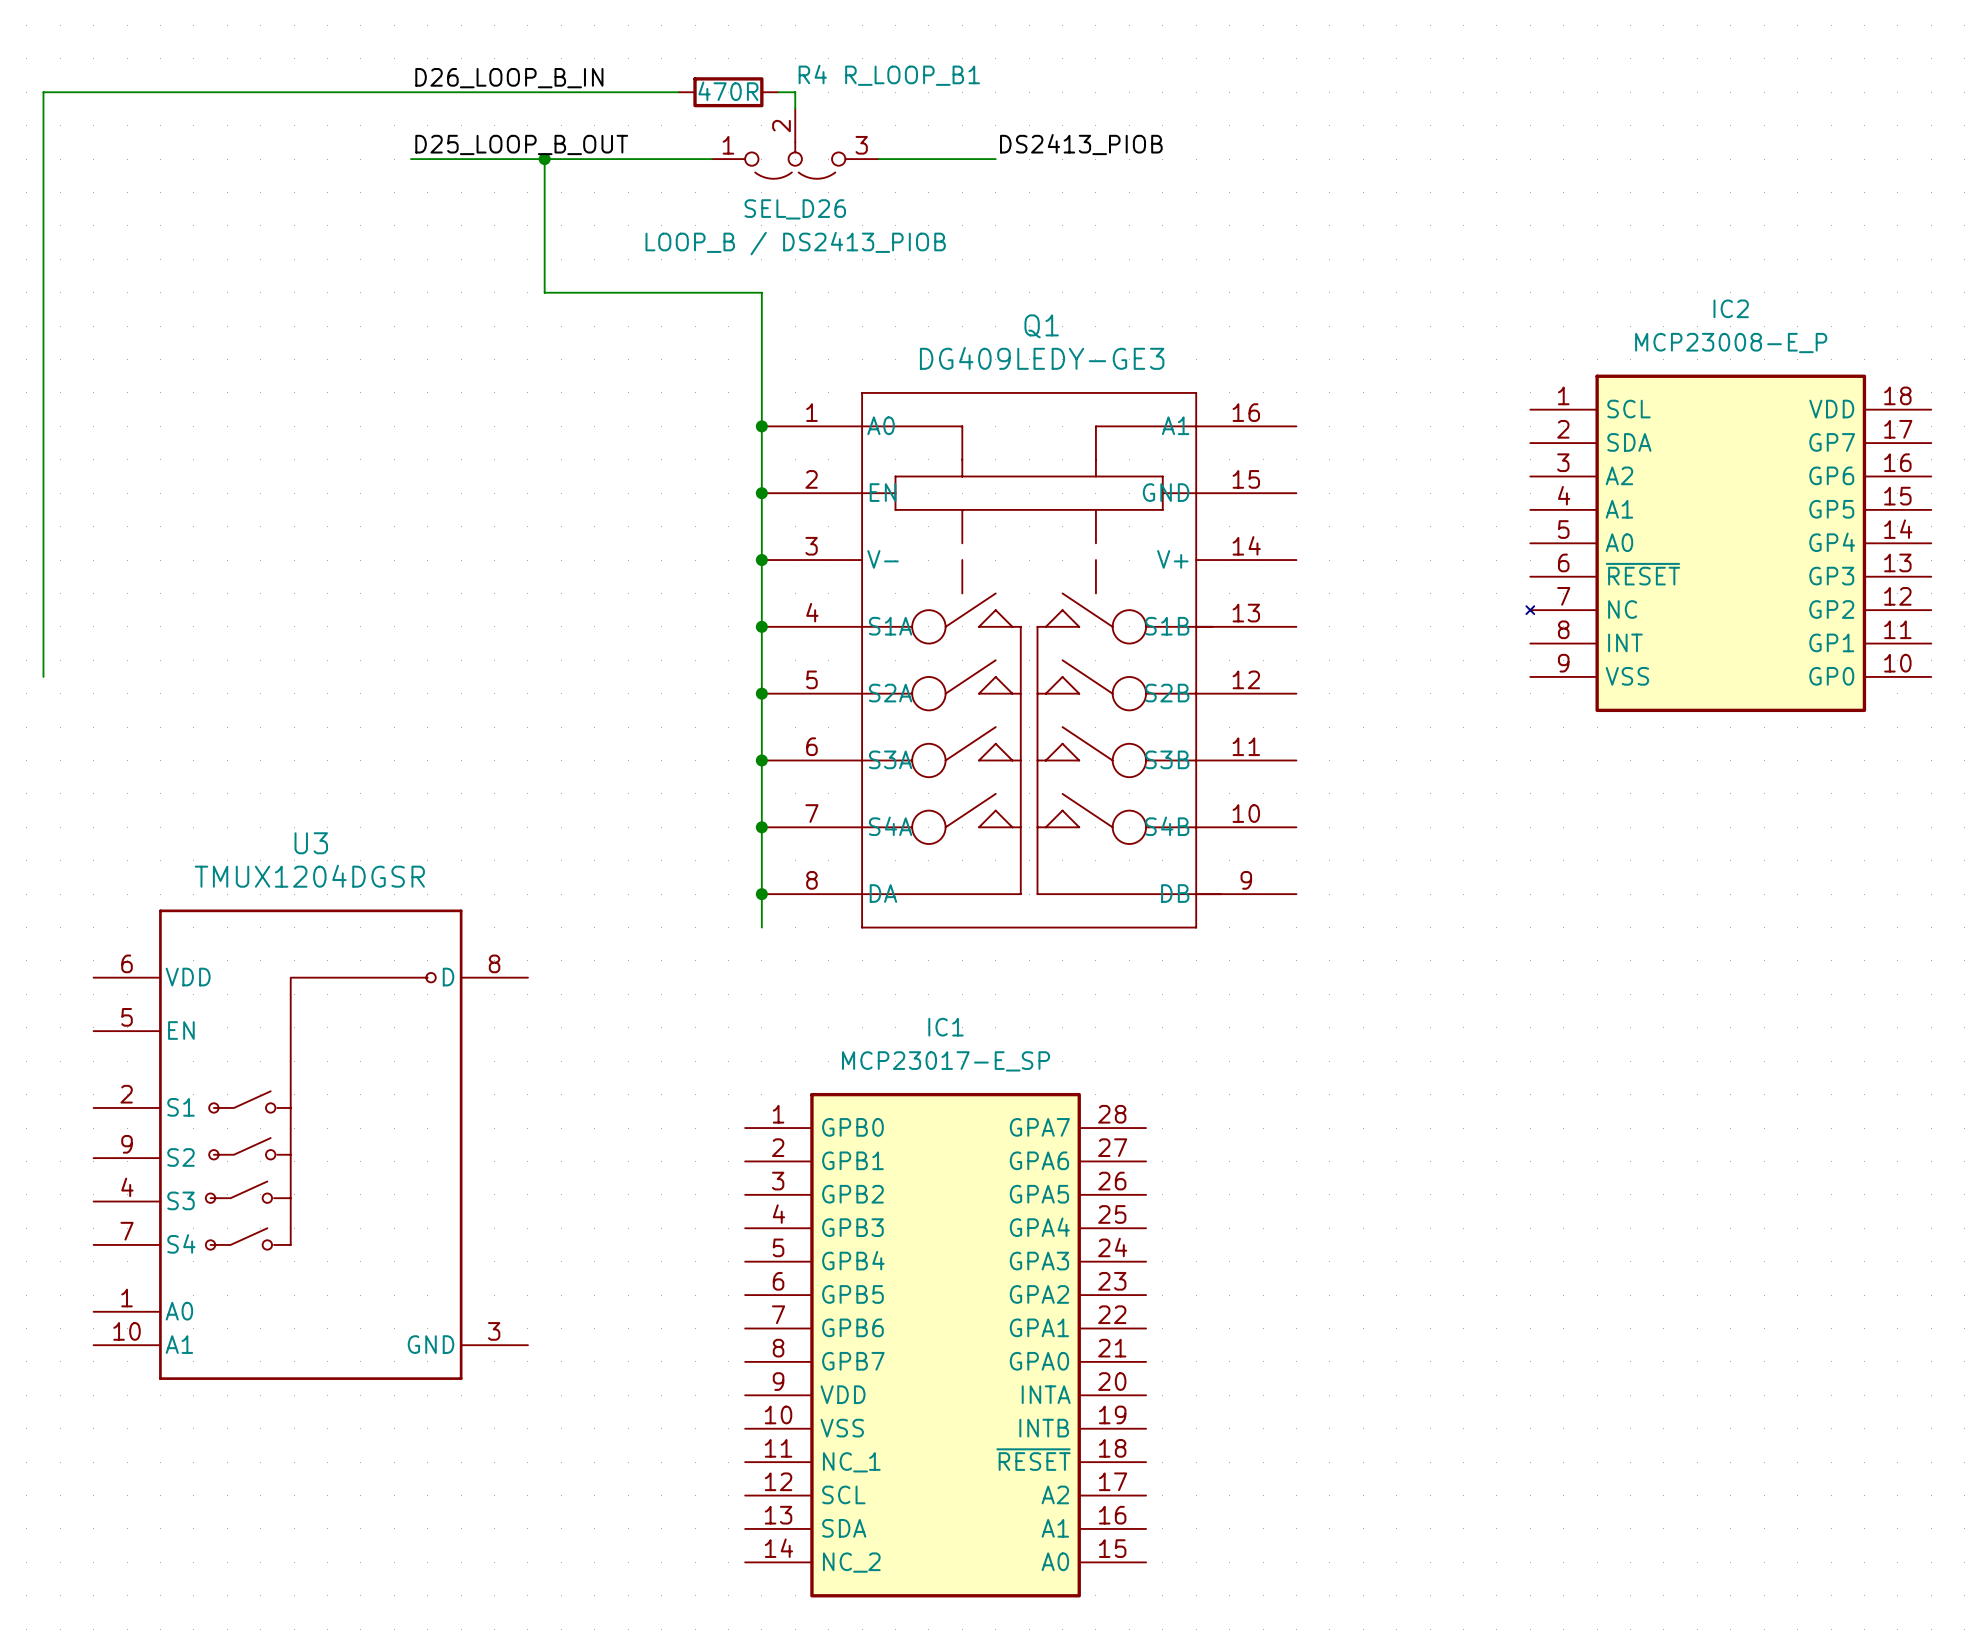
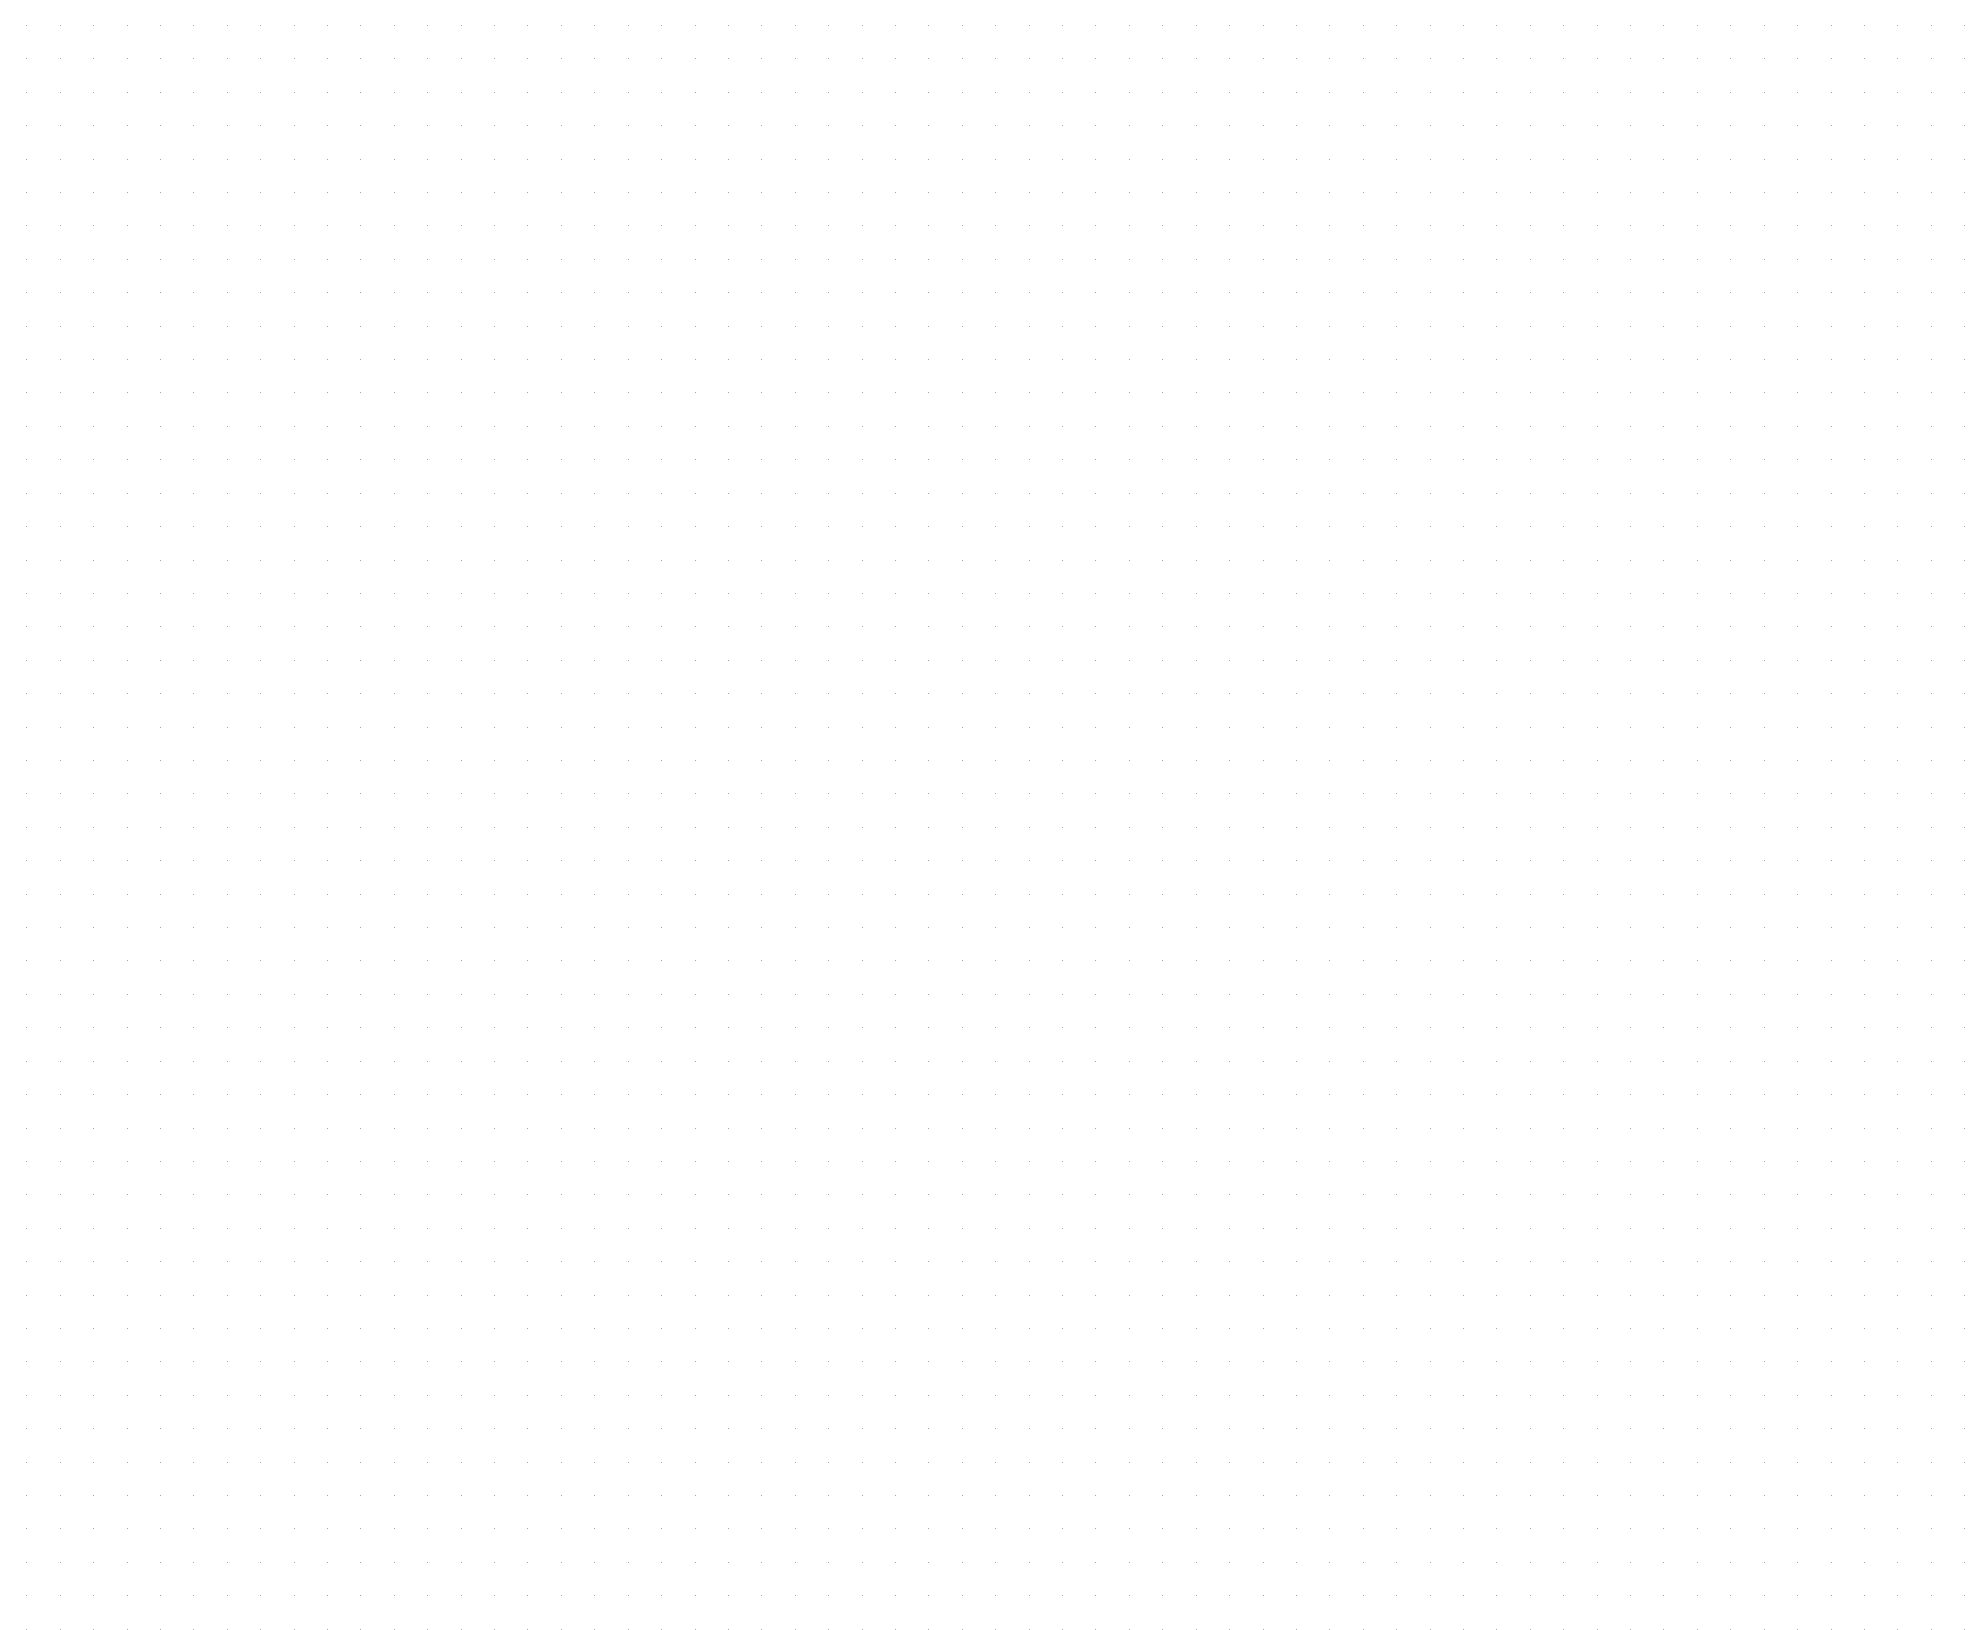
label: D26_LOOP_B_IN (509, 78) -> none
wire: (678, 92) (43, 92) (43, 676) -> none
R4: 470R (728, 92) -> none
wire: (778, 92) (795, 92) (795, 108) -> none
SEL_D26: LOOP_B / DS2413_PIOB (795, 143) -> none
label: D25_LOOP_B_OUT (521, 144) -> none
label: DS2413_PIOB (1081, 144) -> none
wire: (411, 159) (711, 159) -> none
wire: (544, 159) (544, 292) (761, 292) (761, 927) -> none
junction: (544, 159) -> none
wire: (878, 159) (995, 159) -> none
junction: (761, 426) -> none
junction: (761, 493) -> none
IC2: MCP23008-E_P (1728, 543) -> none
junction: (761, 560) -> none
junction: (761, 626) -> none
Q1: DG409LEDY-GE3 (1029, 660) -> none
junction: (761, 693) -> none
junction: (761, 760) -> none
junction: (761, 827) -> none
junction: (761, 894) -> none
U3: TMUX1204DGSR (310, 1144) -> none
IC1: MCP23017-E_SP (945, 1345) -> none

